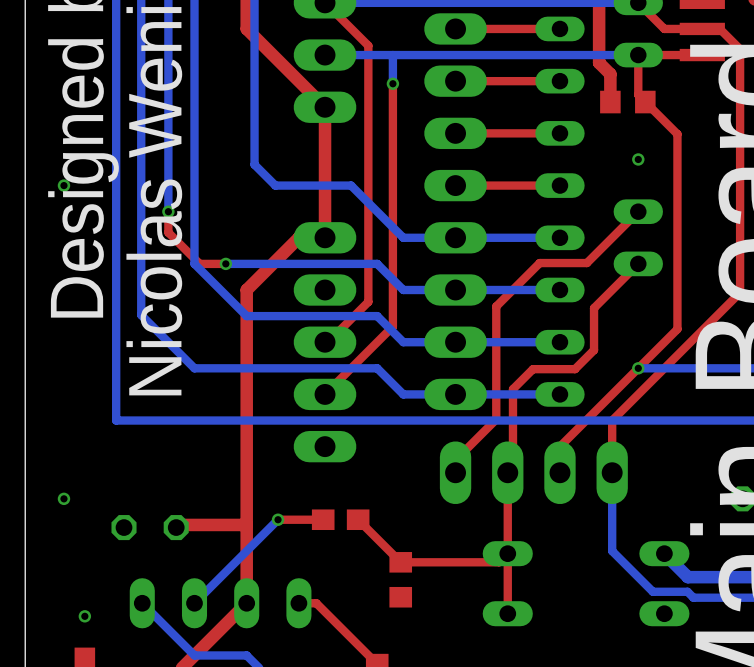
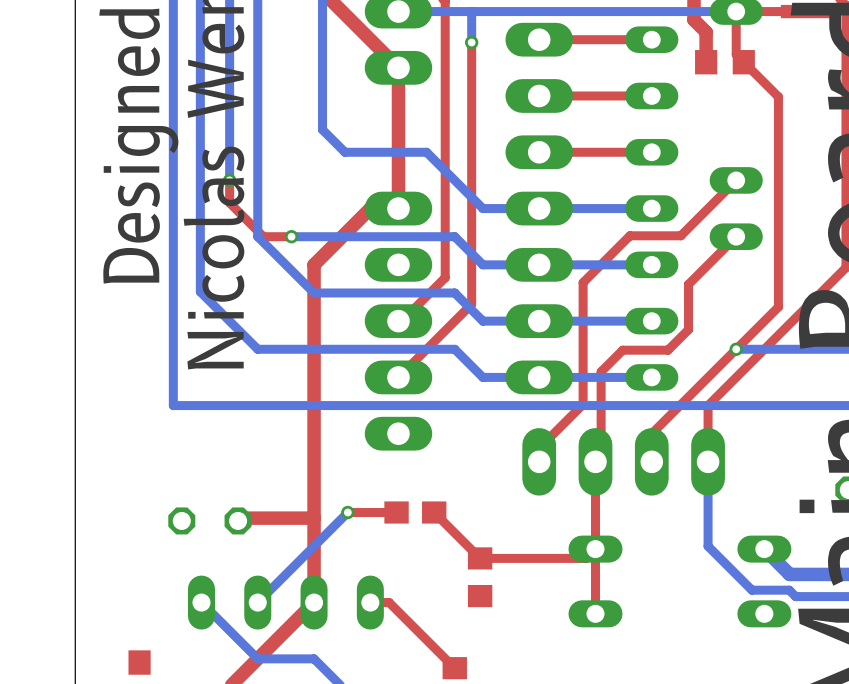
via: (638, 159) -> none
via: (63, 185) -> none
via: (63, 498) -> none
via: (84, 616) -> none

